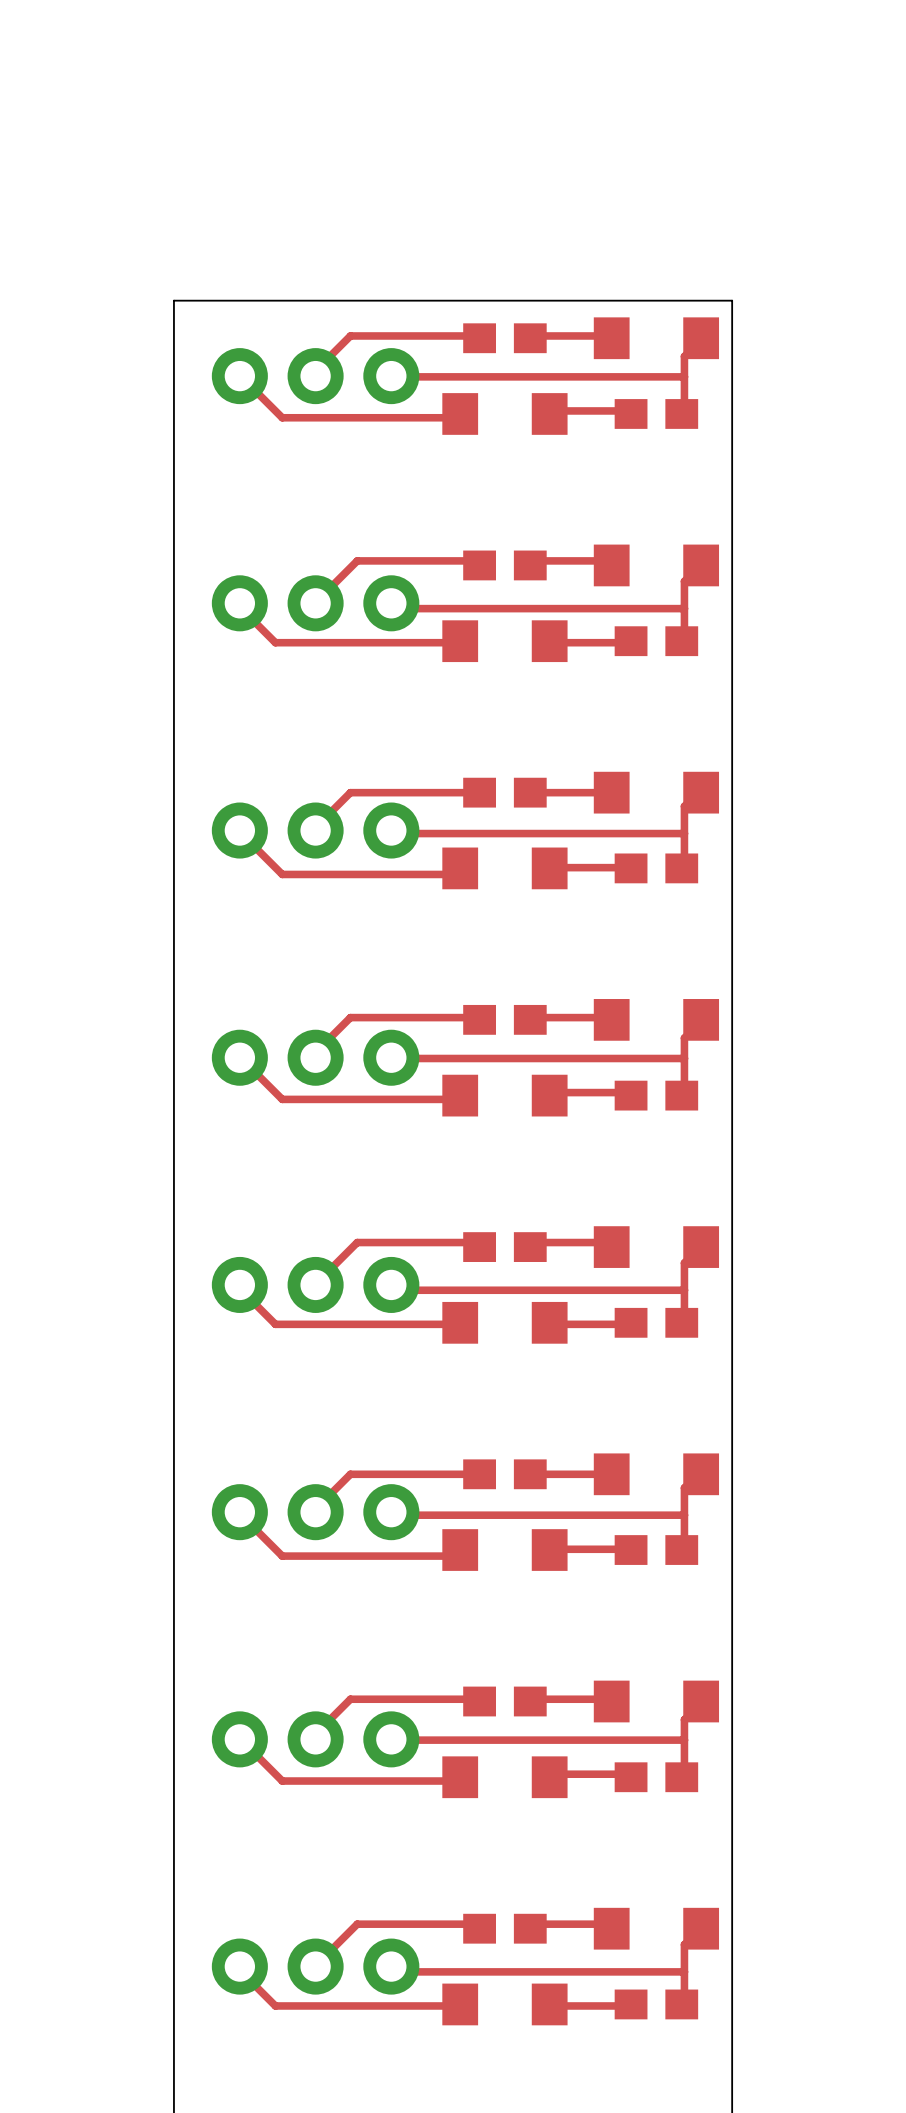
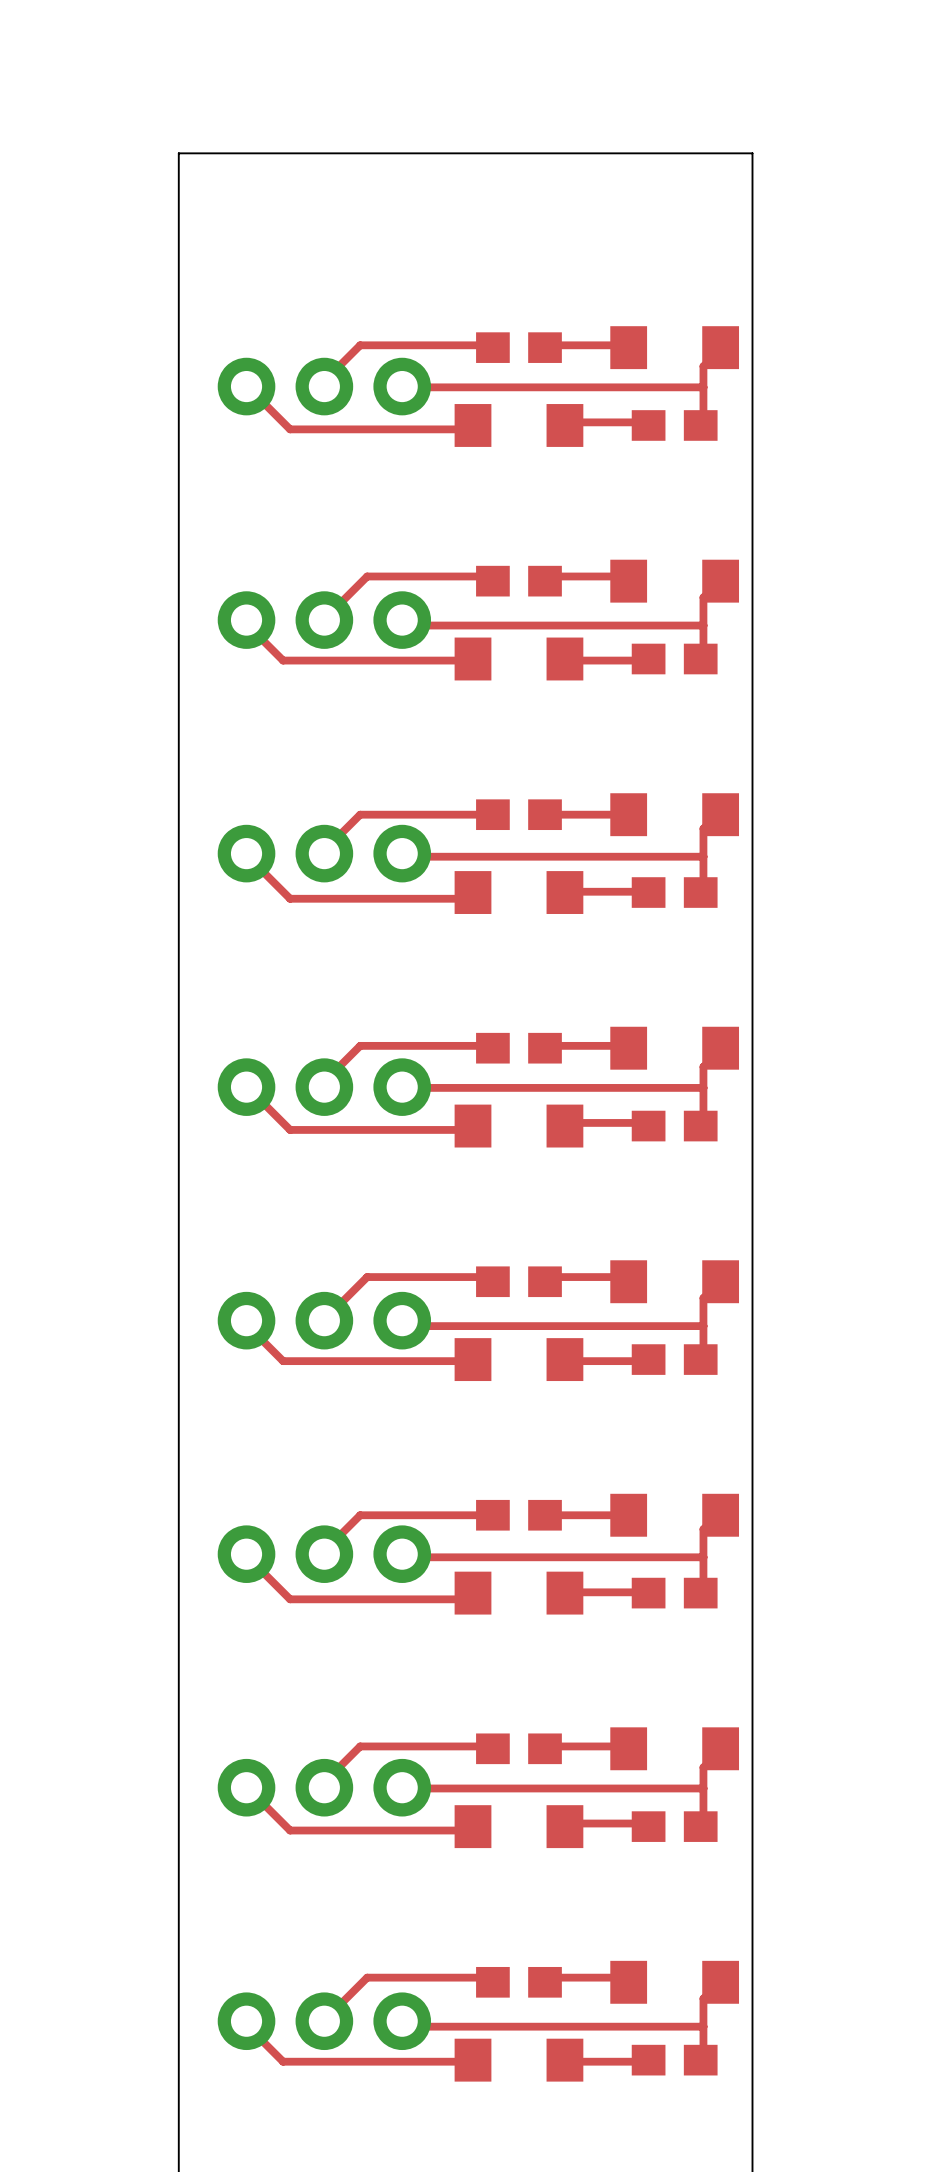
board edge: (732, 300) (173, 300) -> (752, 309) (752, 153) (178, 153) (178, 309)

